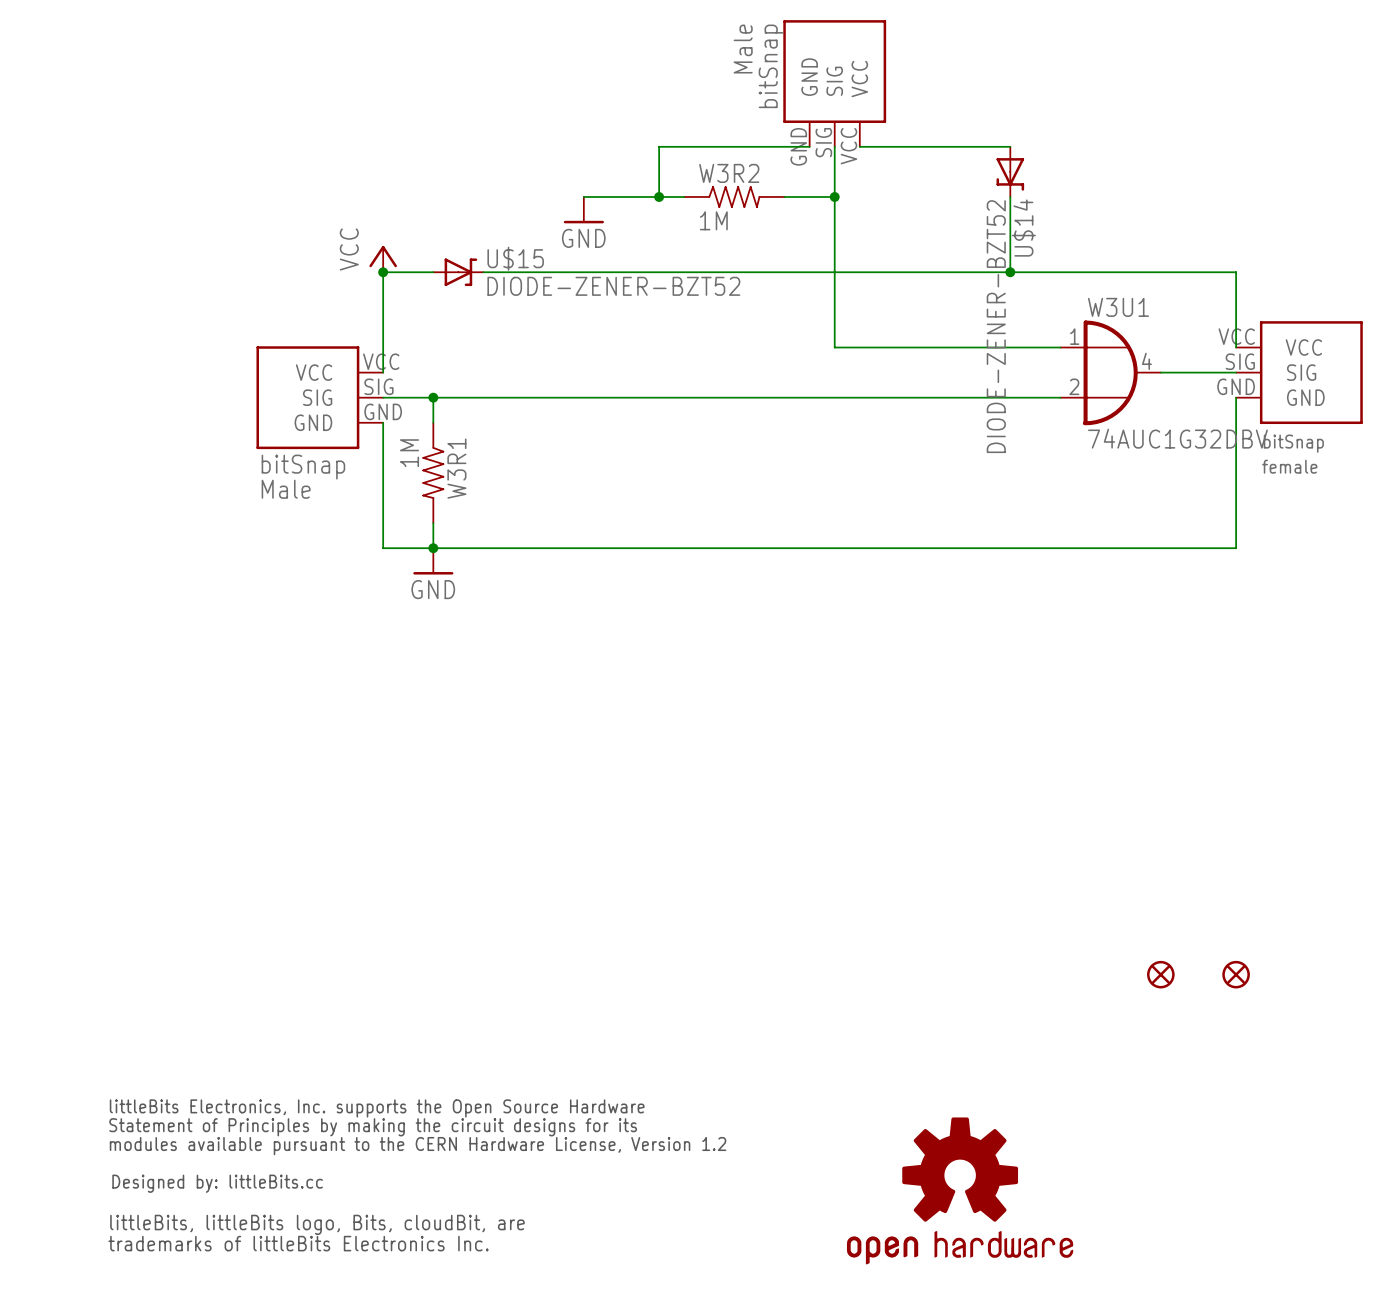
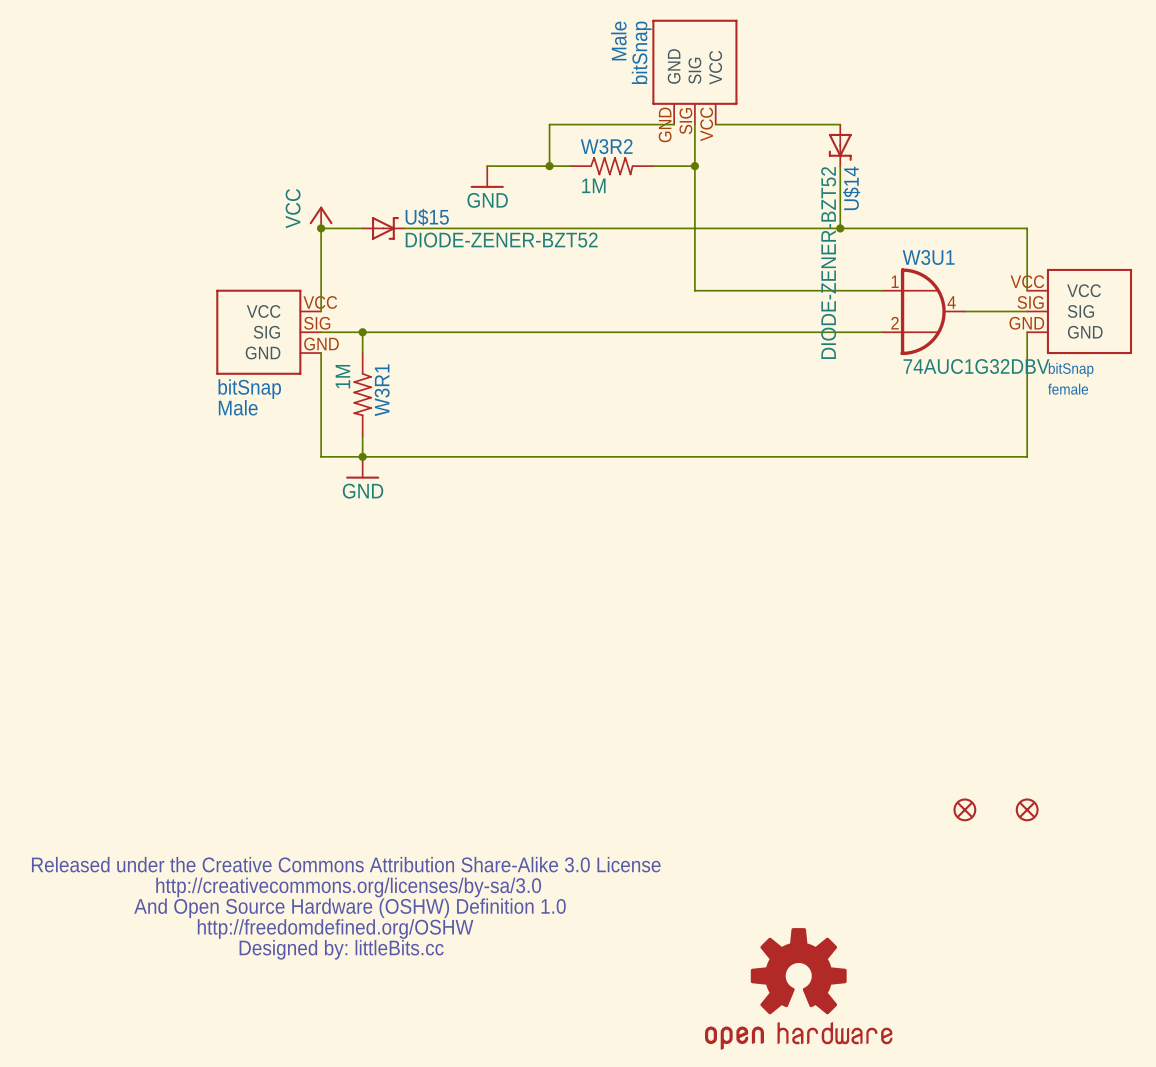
part: none -> (346, 908)
part: (417, 1175) -> none

